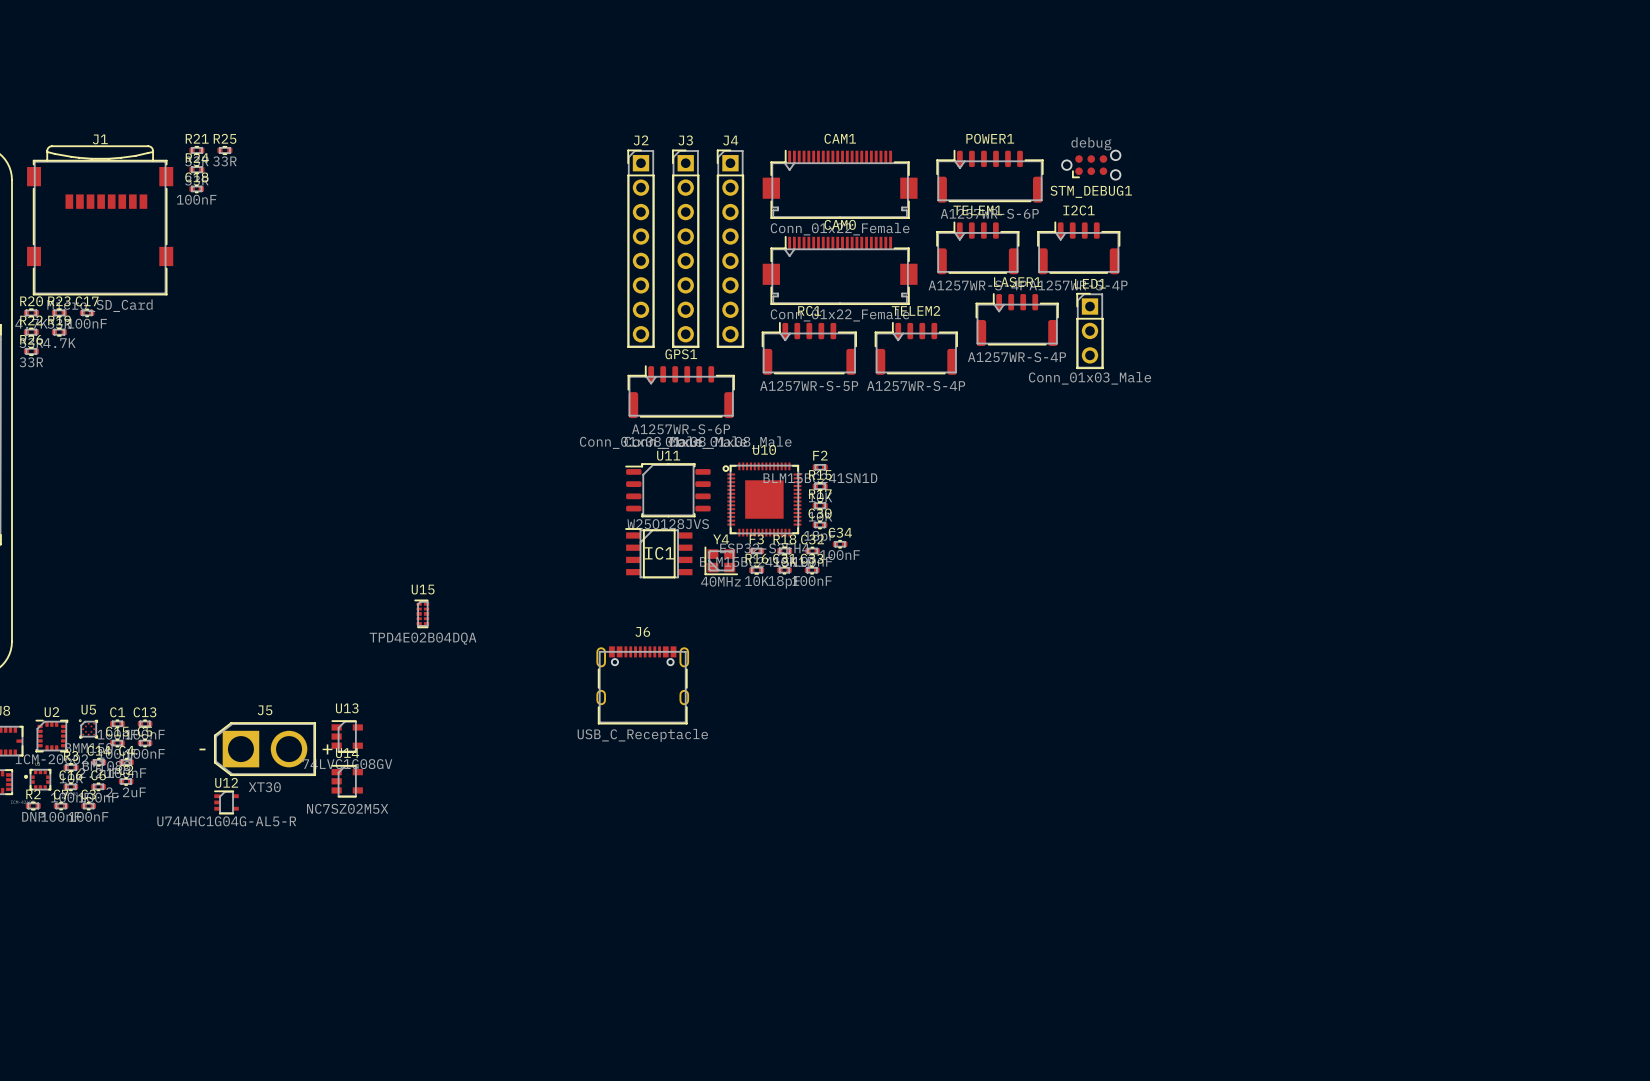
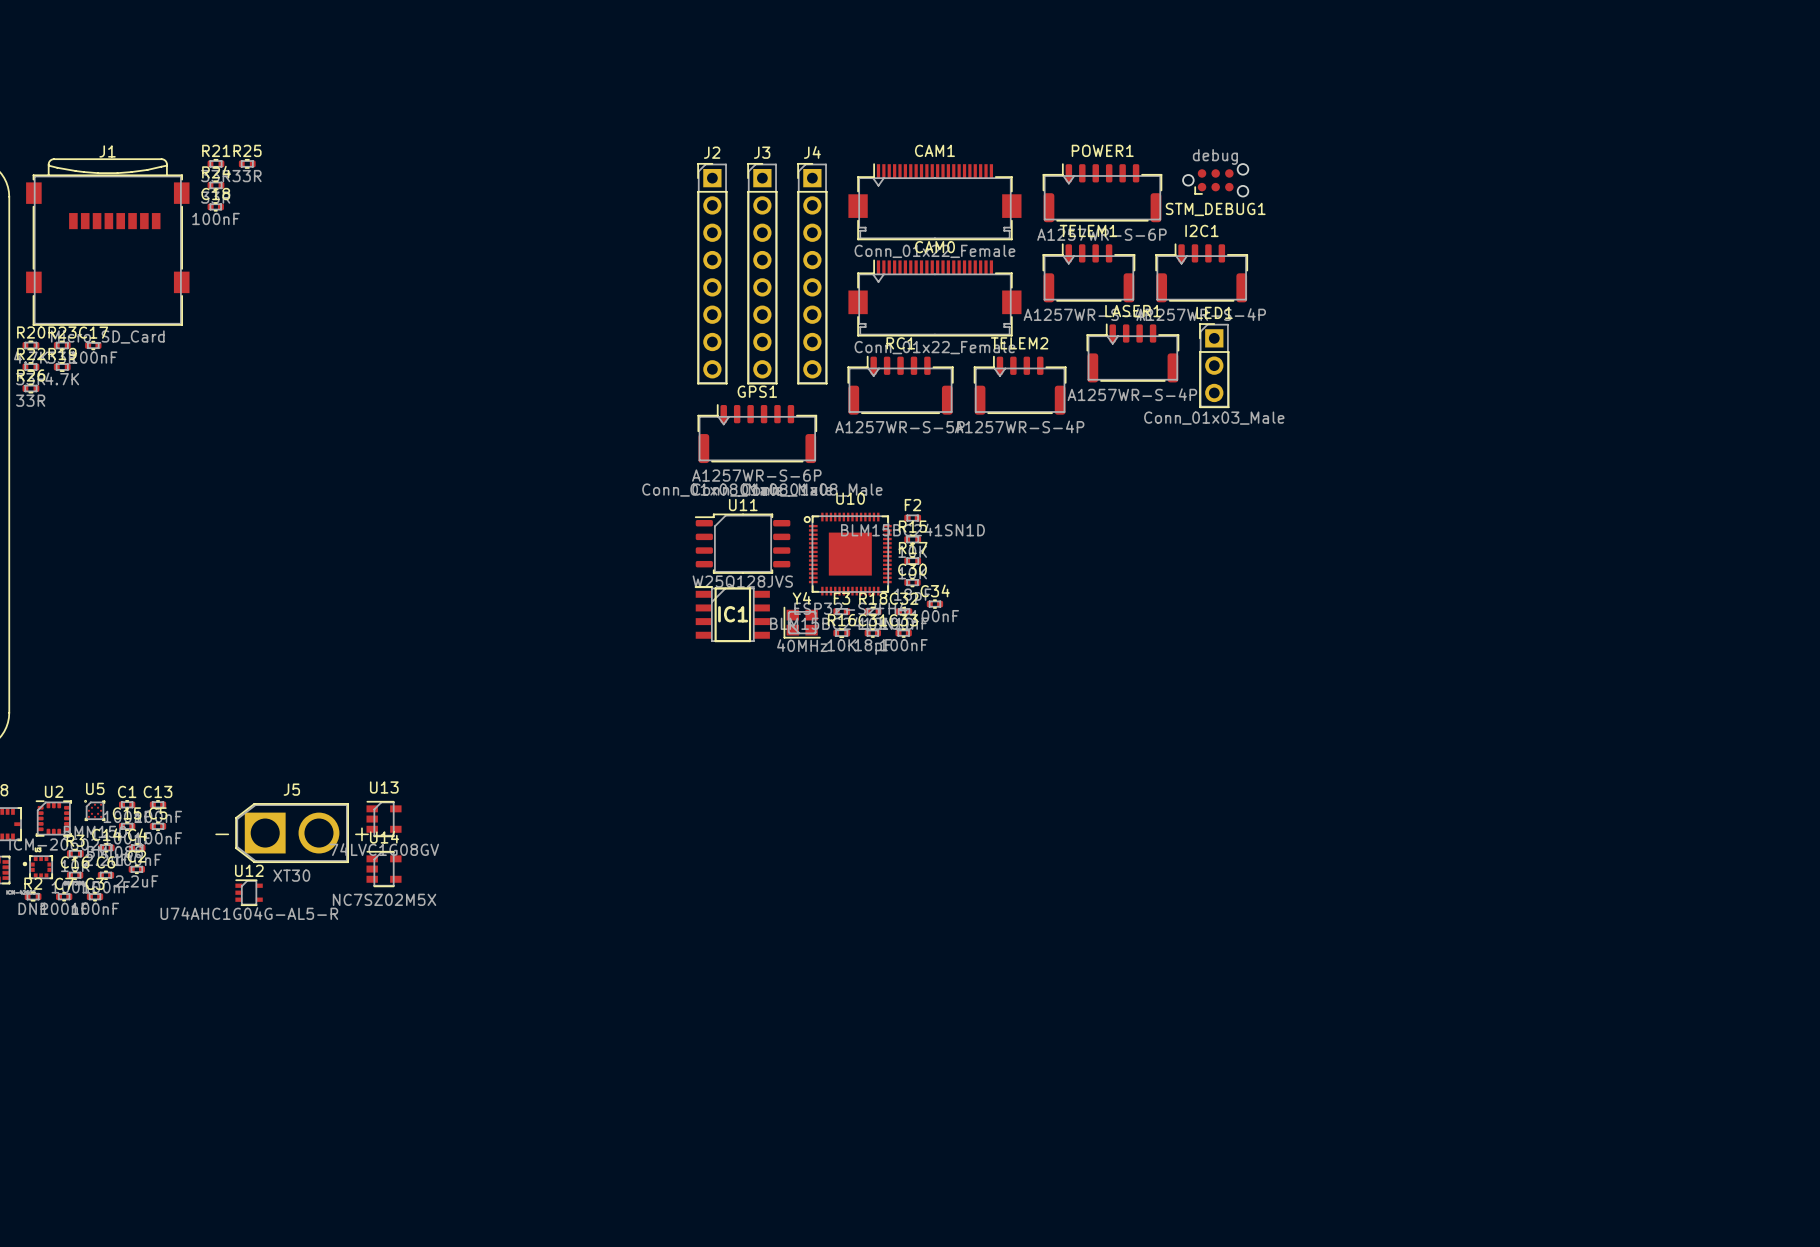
U15: TPD4E02B04DQA (421, 613) -> none
J6: USB_C_Receptacle (642, 685) -> none

